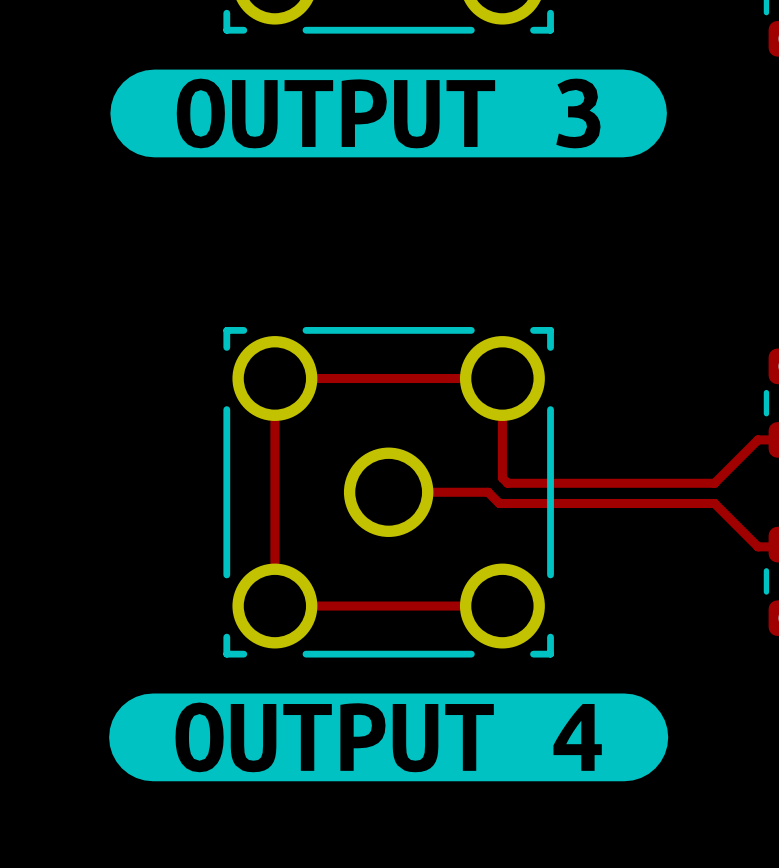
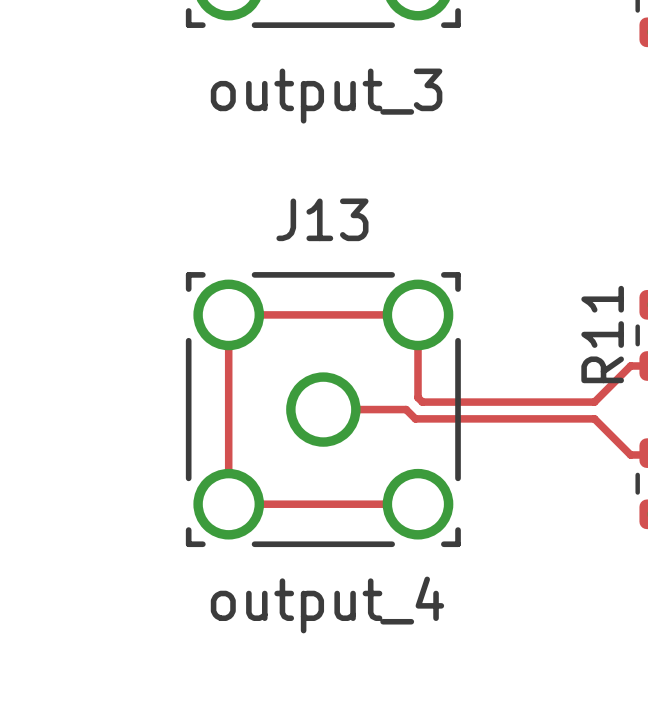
drawing: [110, 69, 667, 158] -> none
text: none -> output_3 (326, 96)
J13 name: none -> J13 (322, 219)
R11 name: none -> R11 (602, 334)
drawing: [109, 693, 669, 782] -> none
text: none -> output_4 (327, 604)

